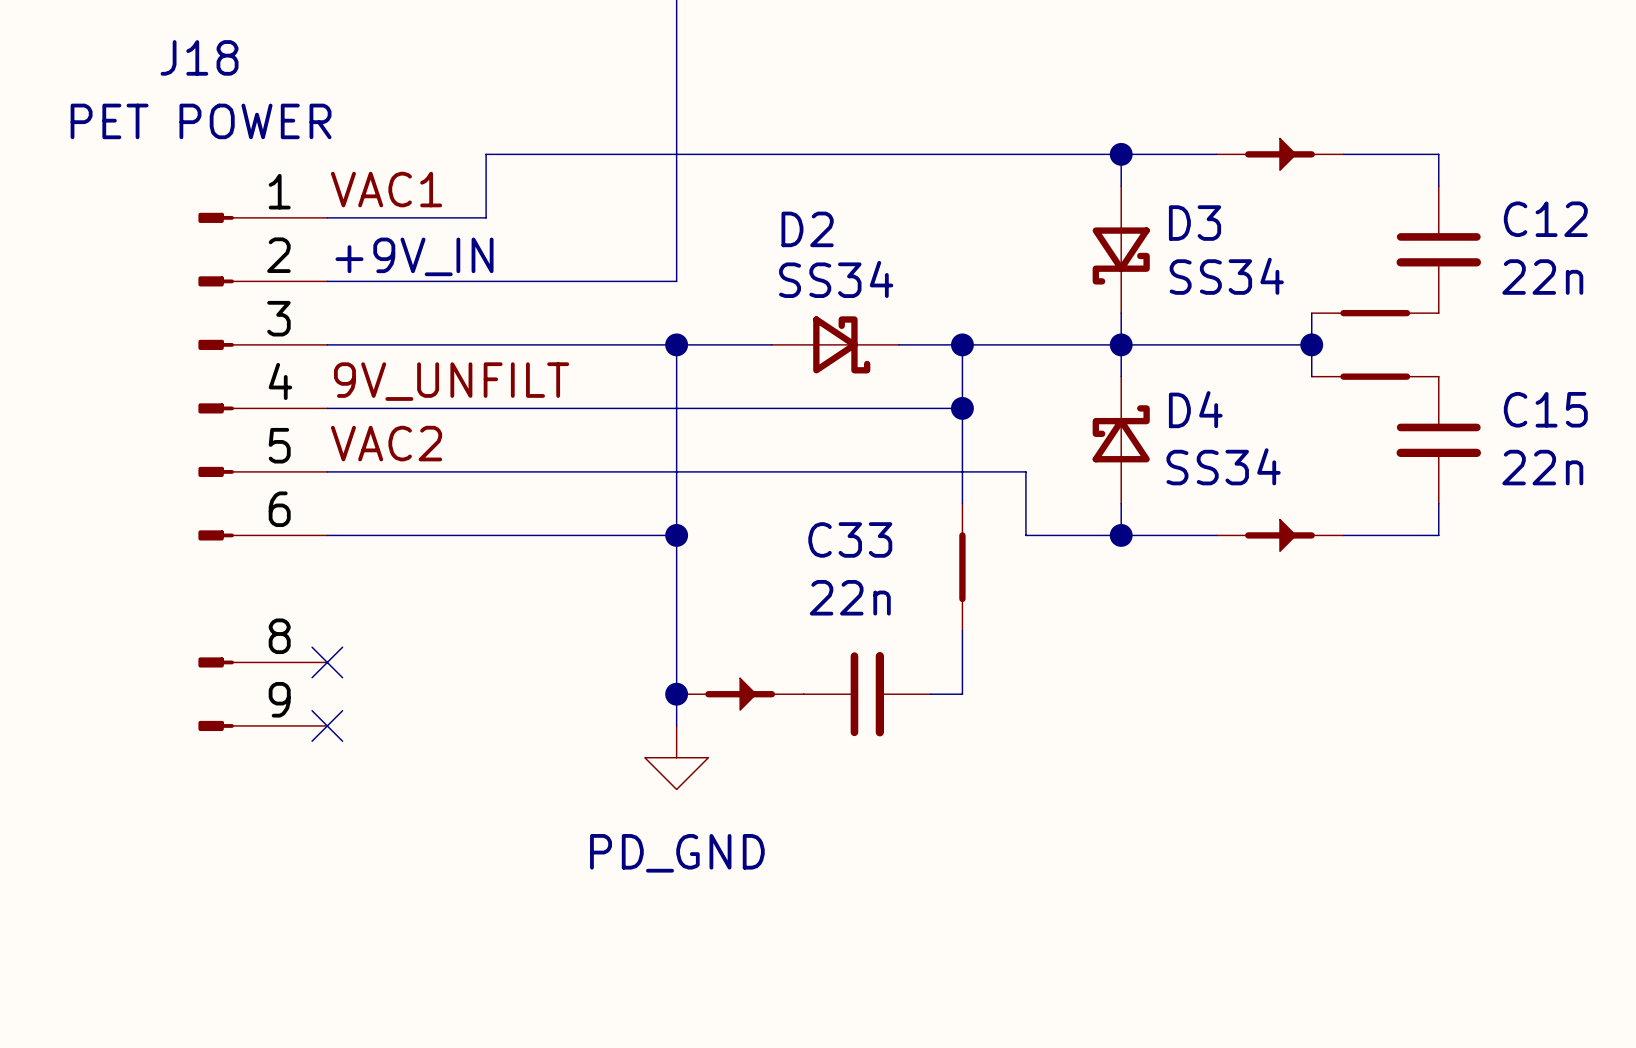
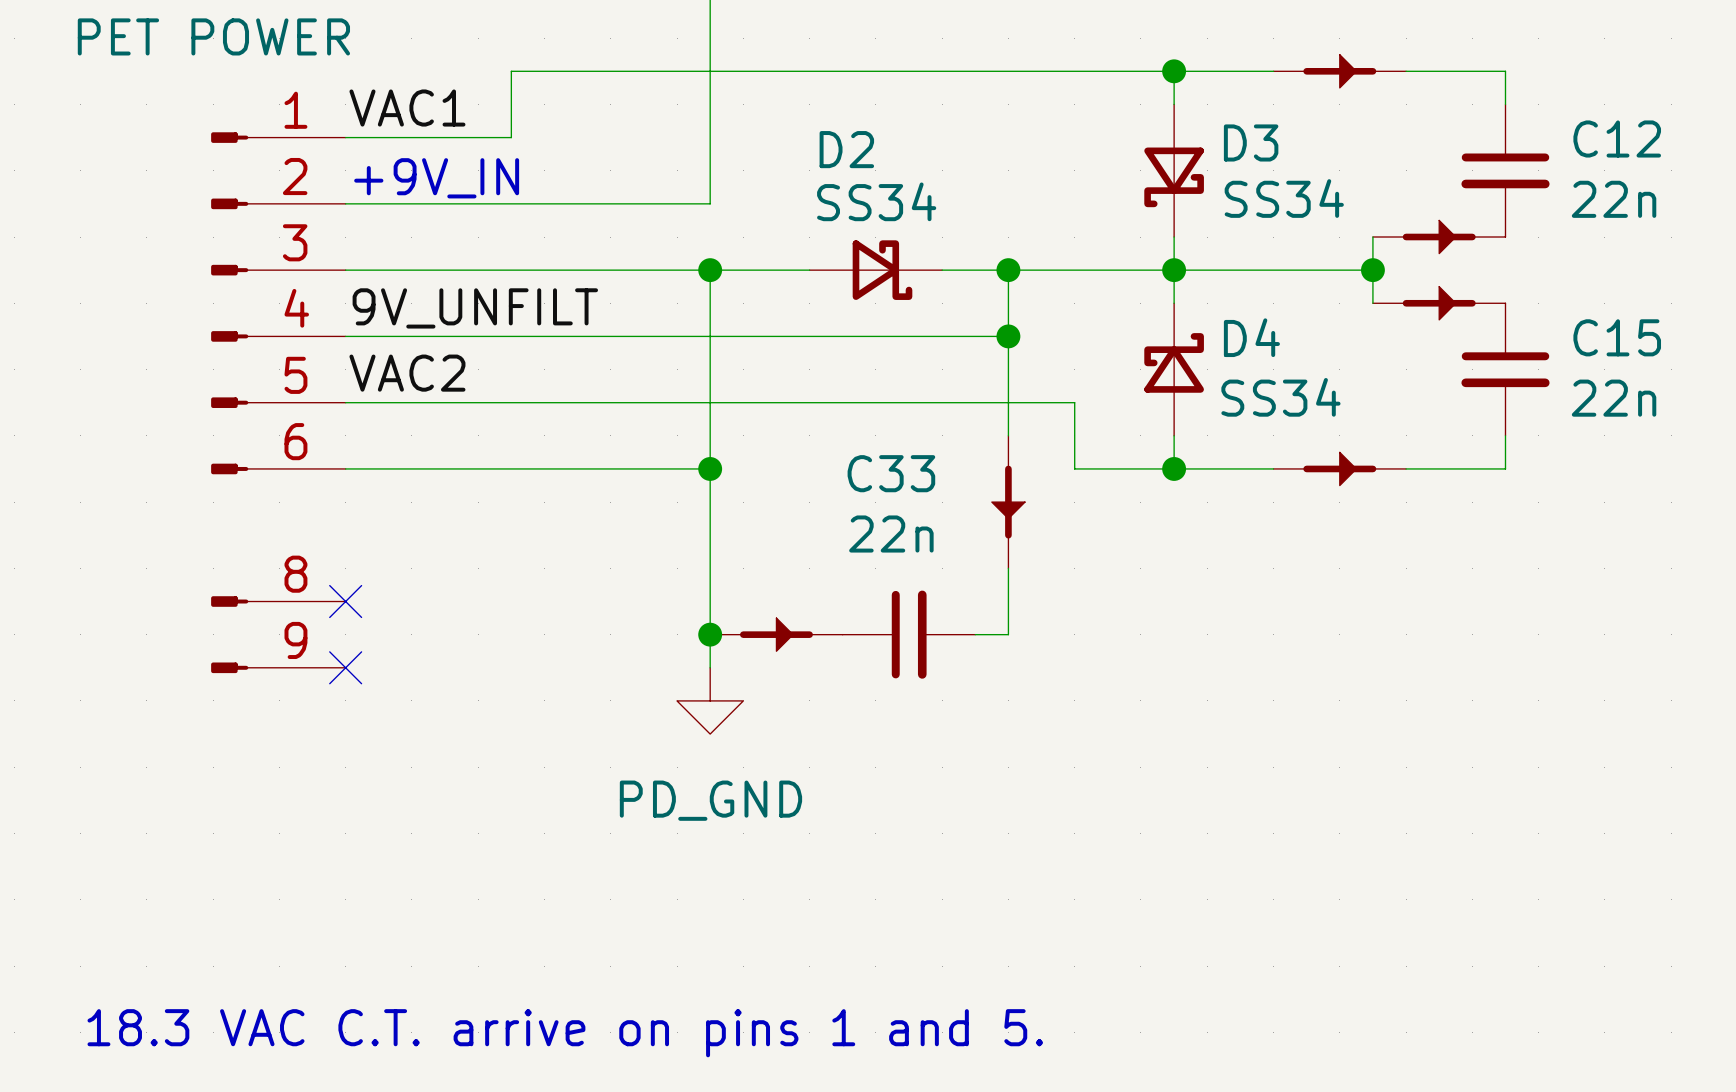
part symbol: [1311, 309, 1439, 317] -> [1372, 220, 1506, 254]
part symbol: [1311, 373, 1439, 380] -> [1372, 286, 1506, 320]
part symbol: [959, 503, 966, 631] -> [991, 435, 1025, 569]

